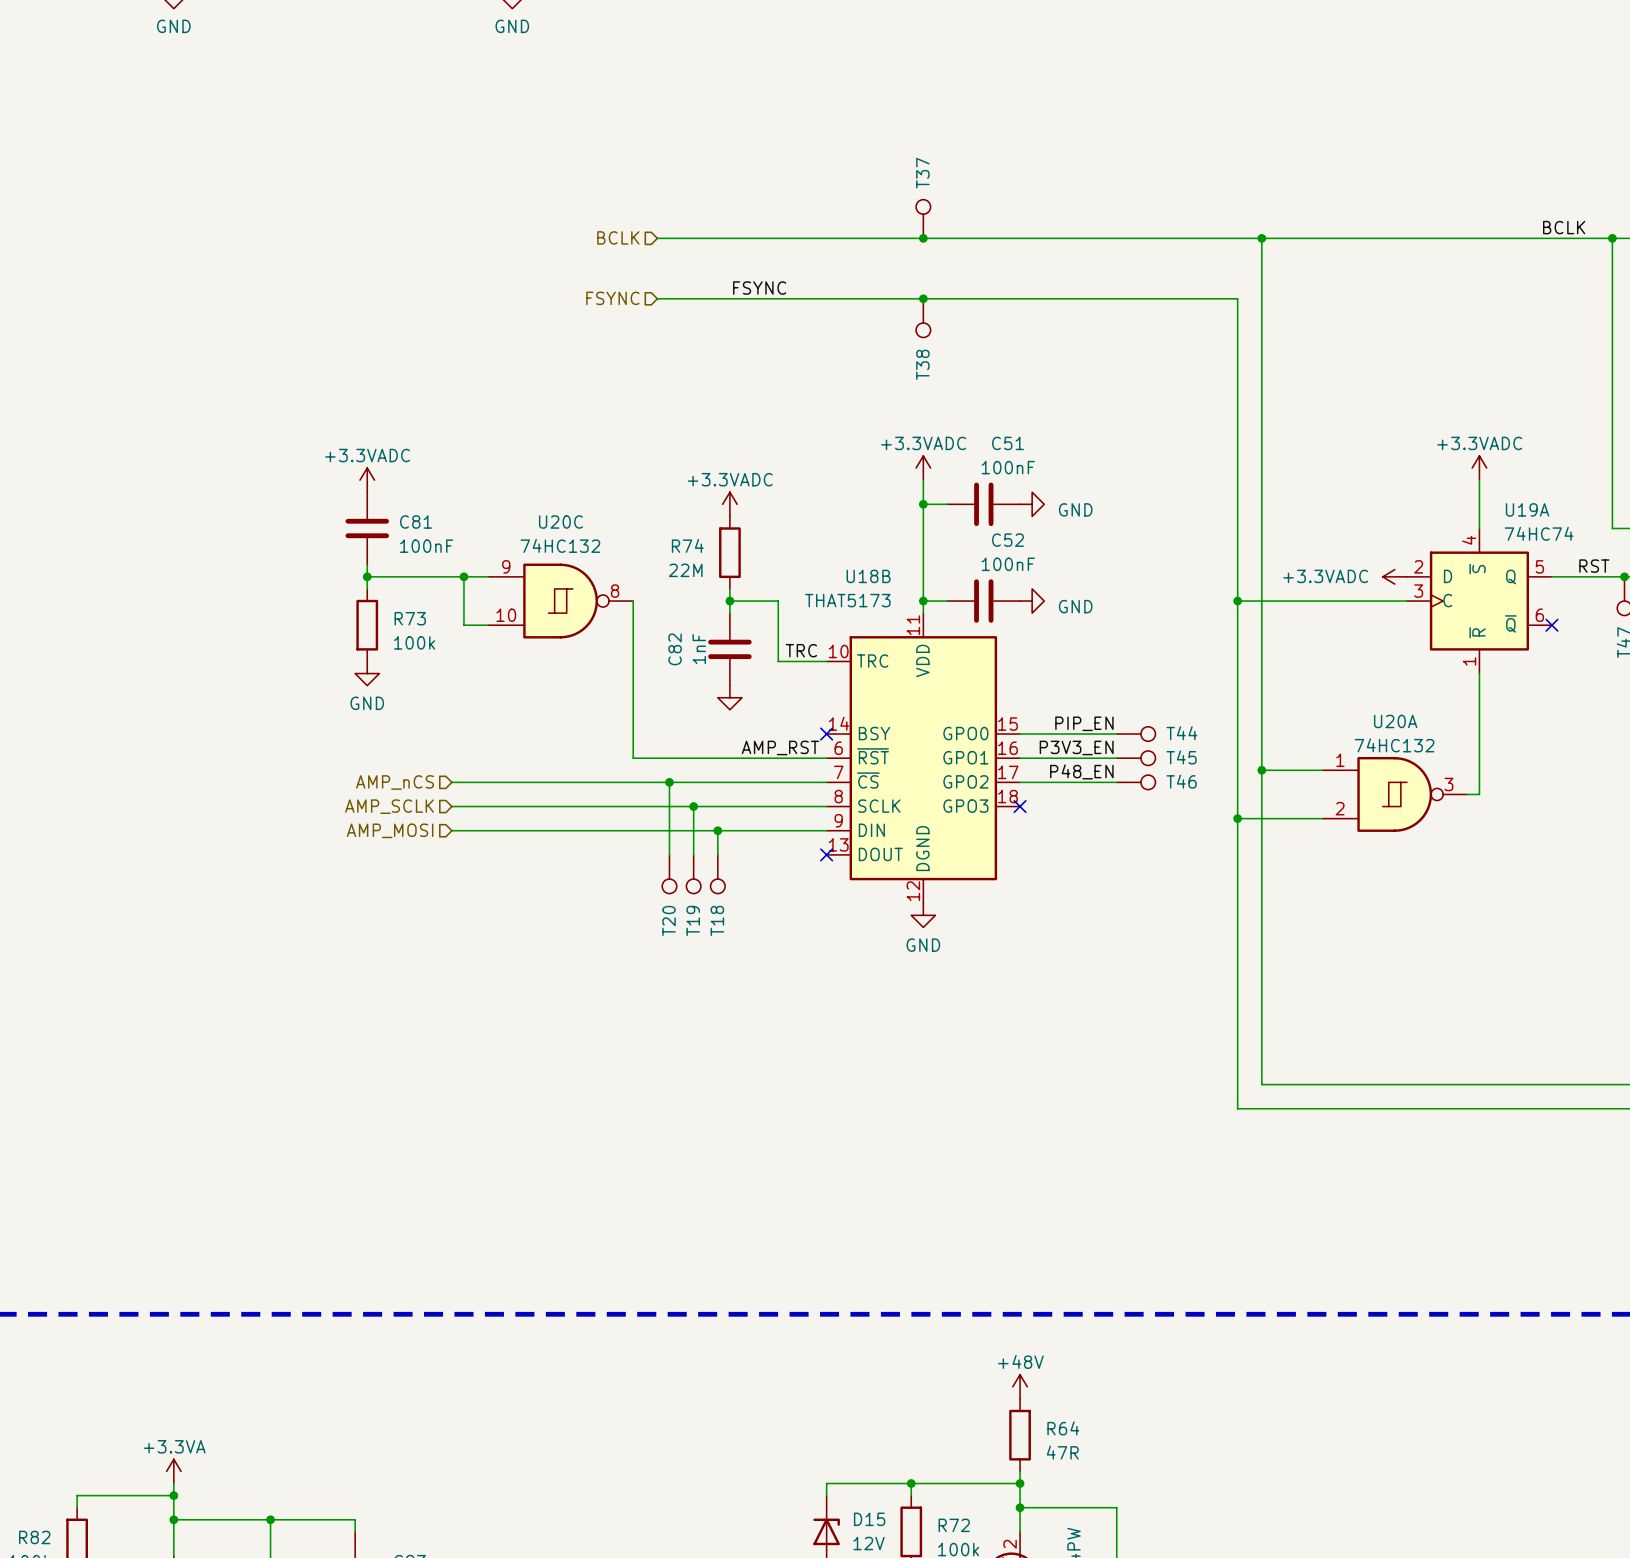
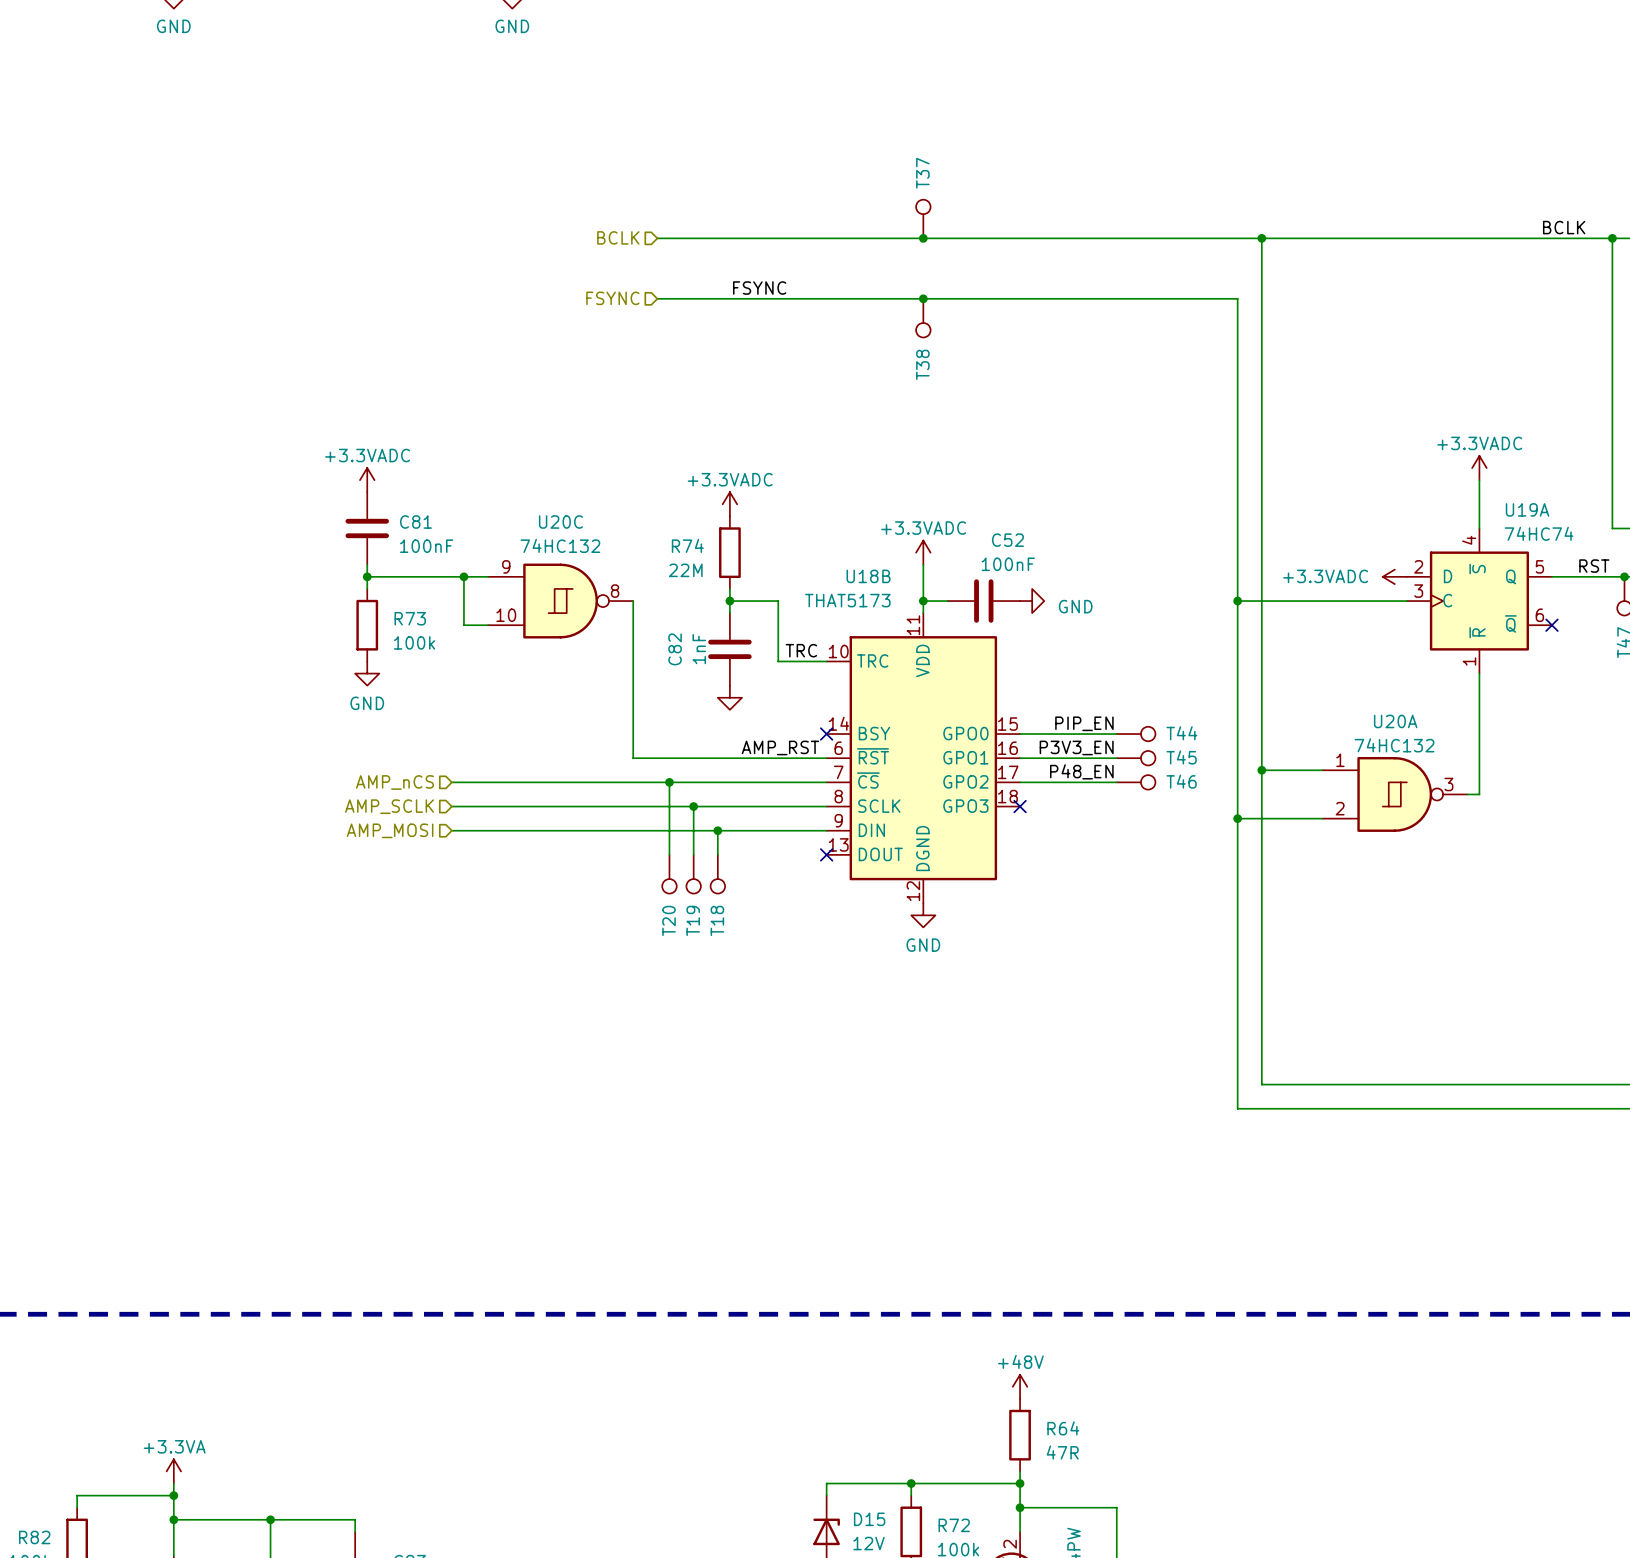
power symbol position: +3.3VADC (923, 468) -> +3.3VADC (923, 552)
wire: (923, 480) (923, 564) -> none
wire: (923, 504) (947, 504) -> none
junction: (923, 504) -> none
C51: 100nF (983, 504) -> none
power symbol: GND (1032, 504) -> none

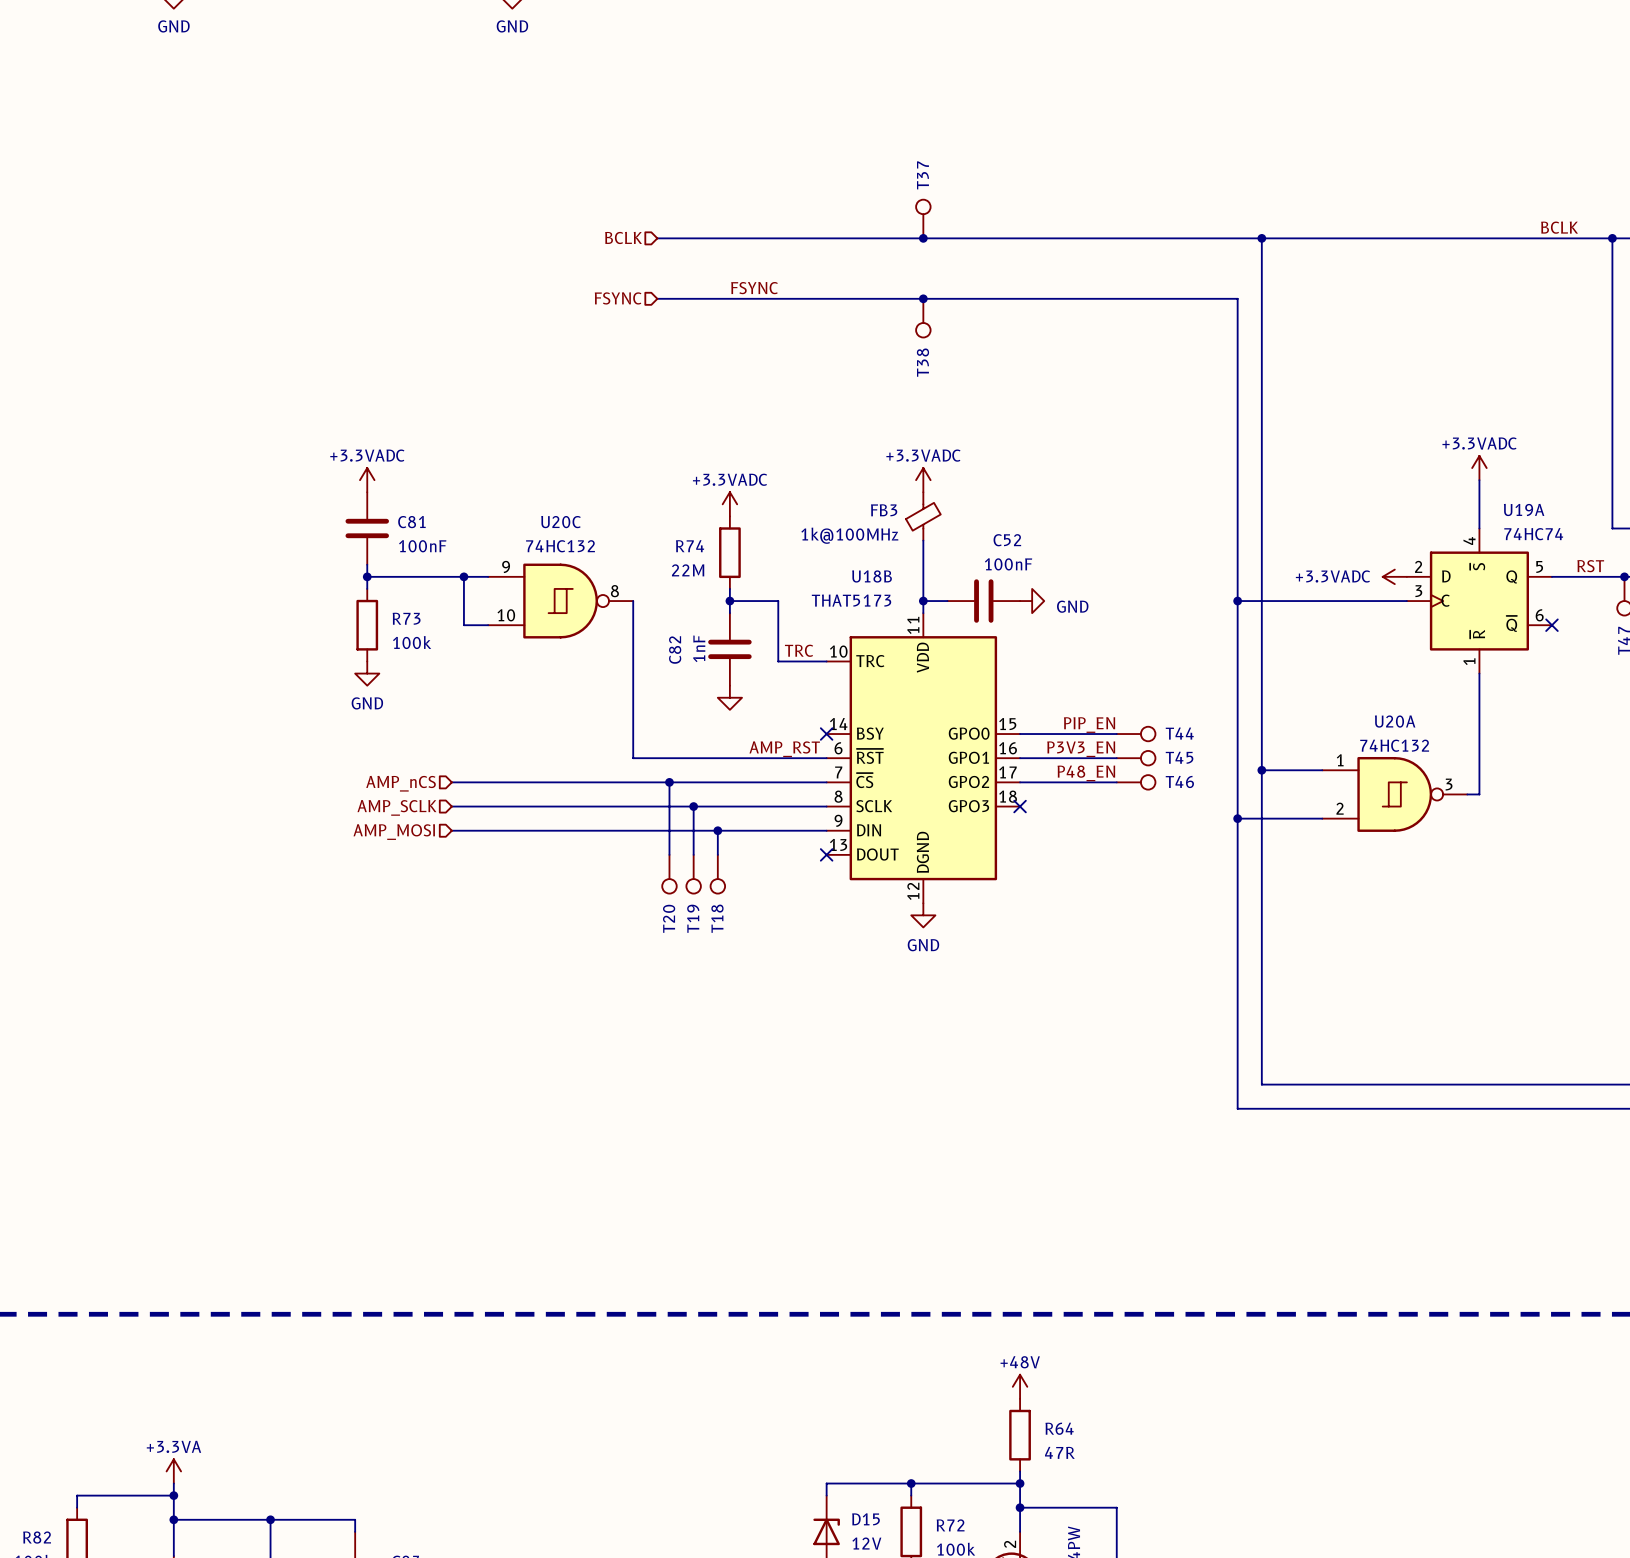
FB3: none -> 1k@100MHz (923, 516)
power symbol position: +3.3VADC (923, 552) -> +3.3VADC (923, 480)

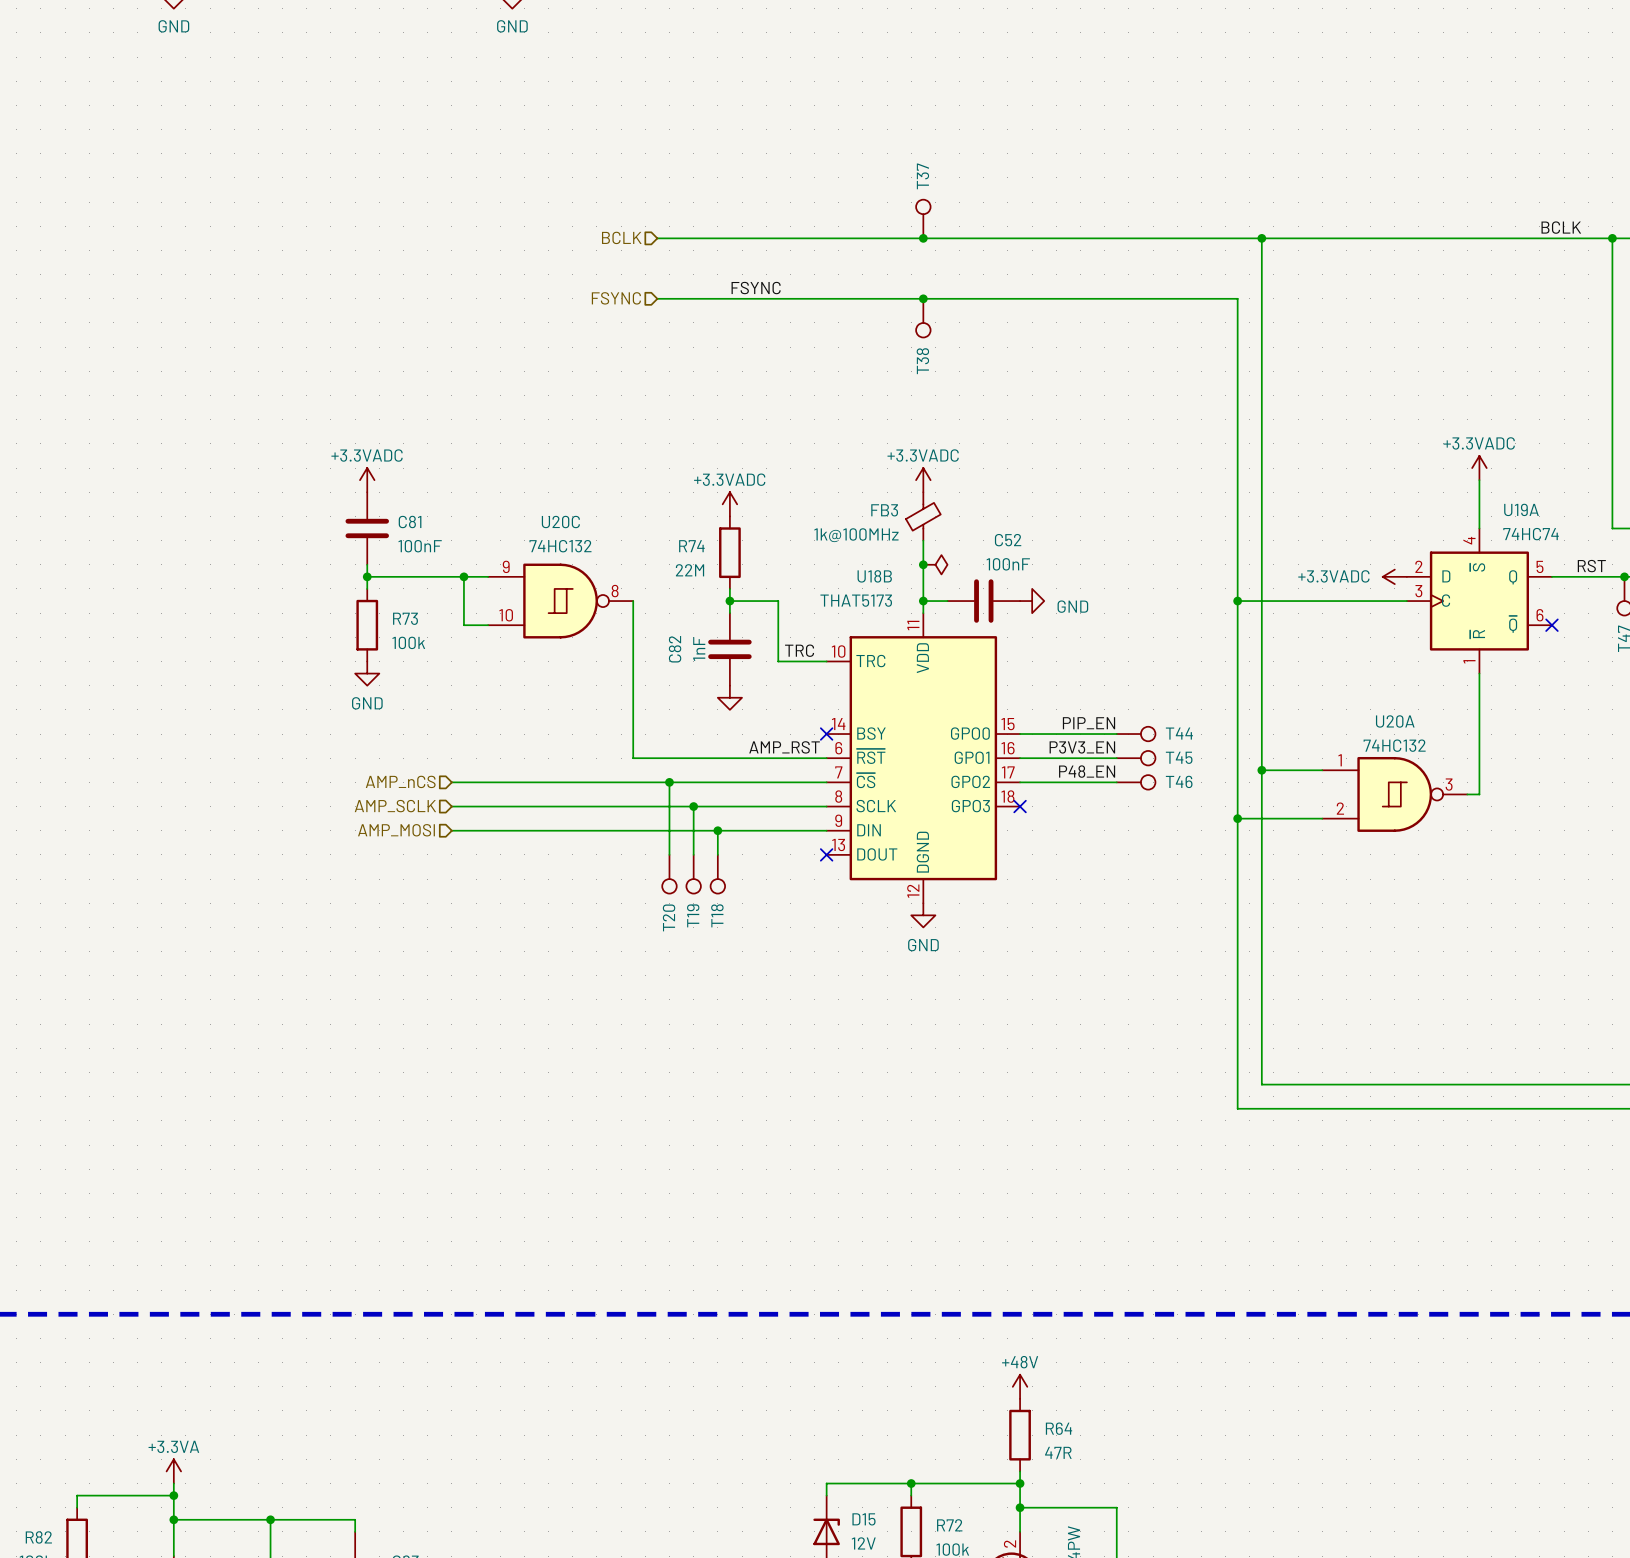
junction: none -> (923, 564)
power symbol: none -> (935, 564)

